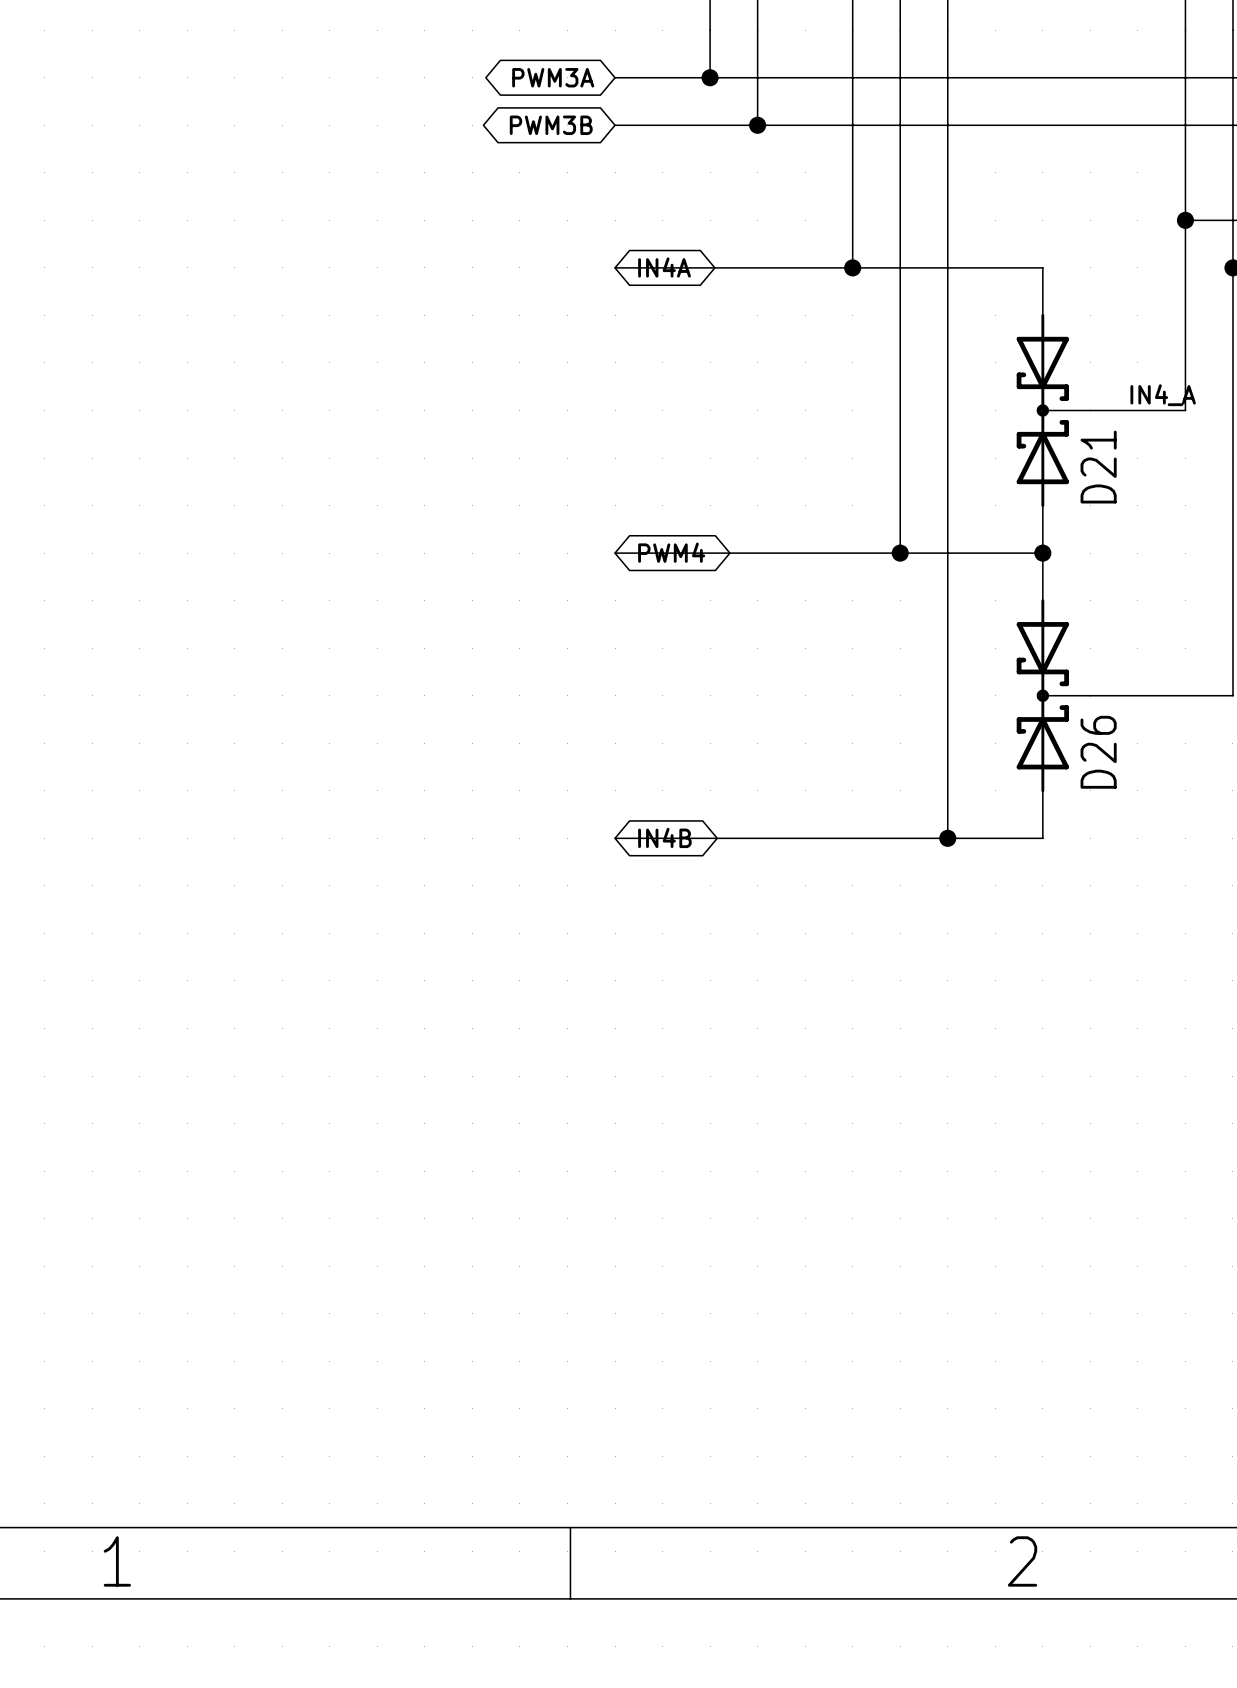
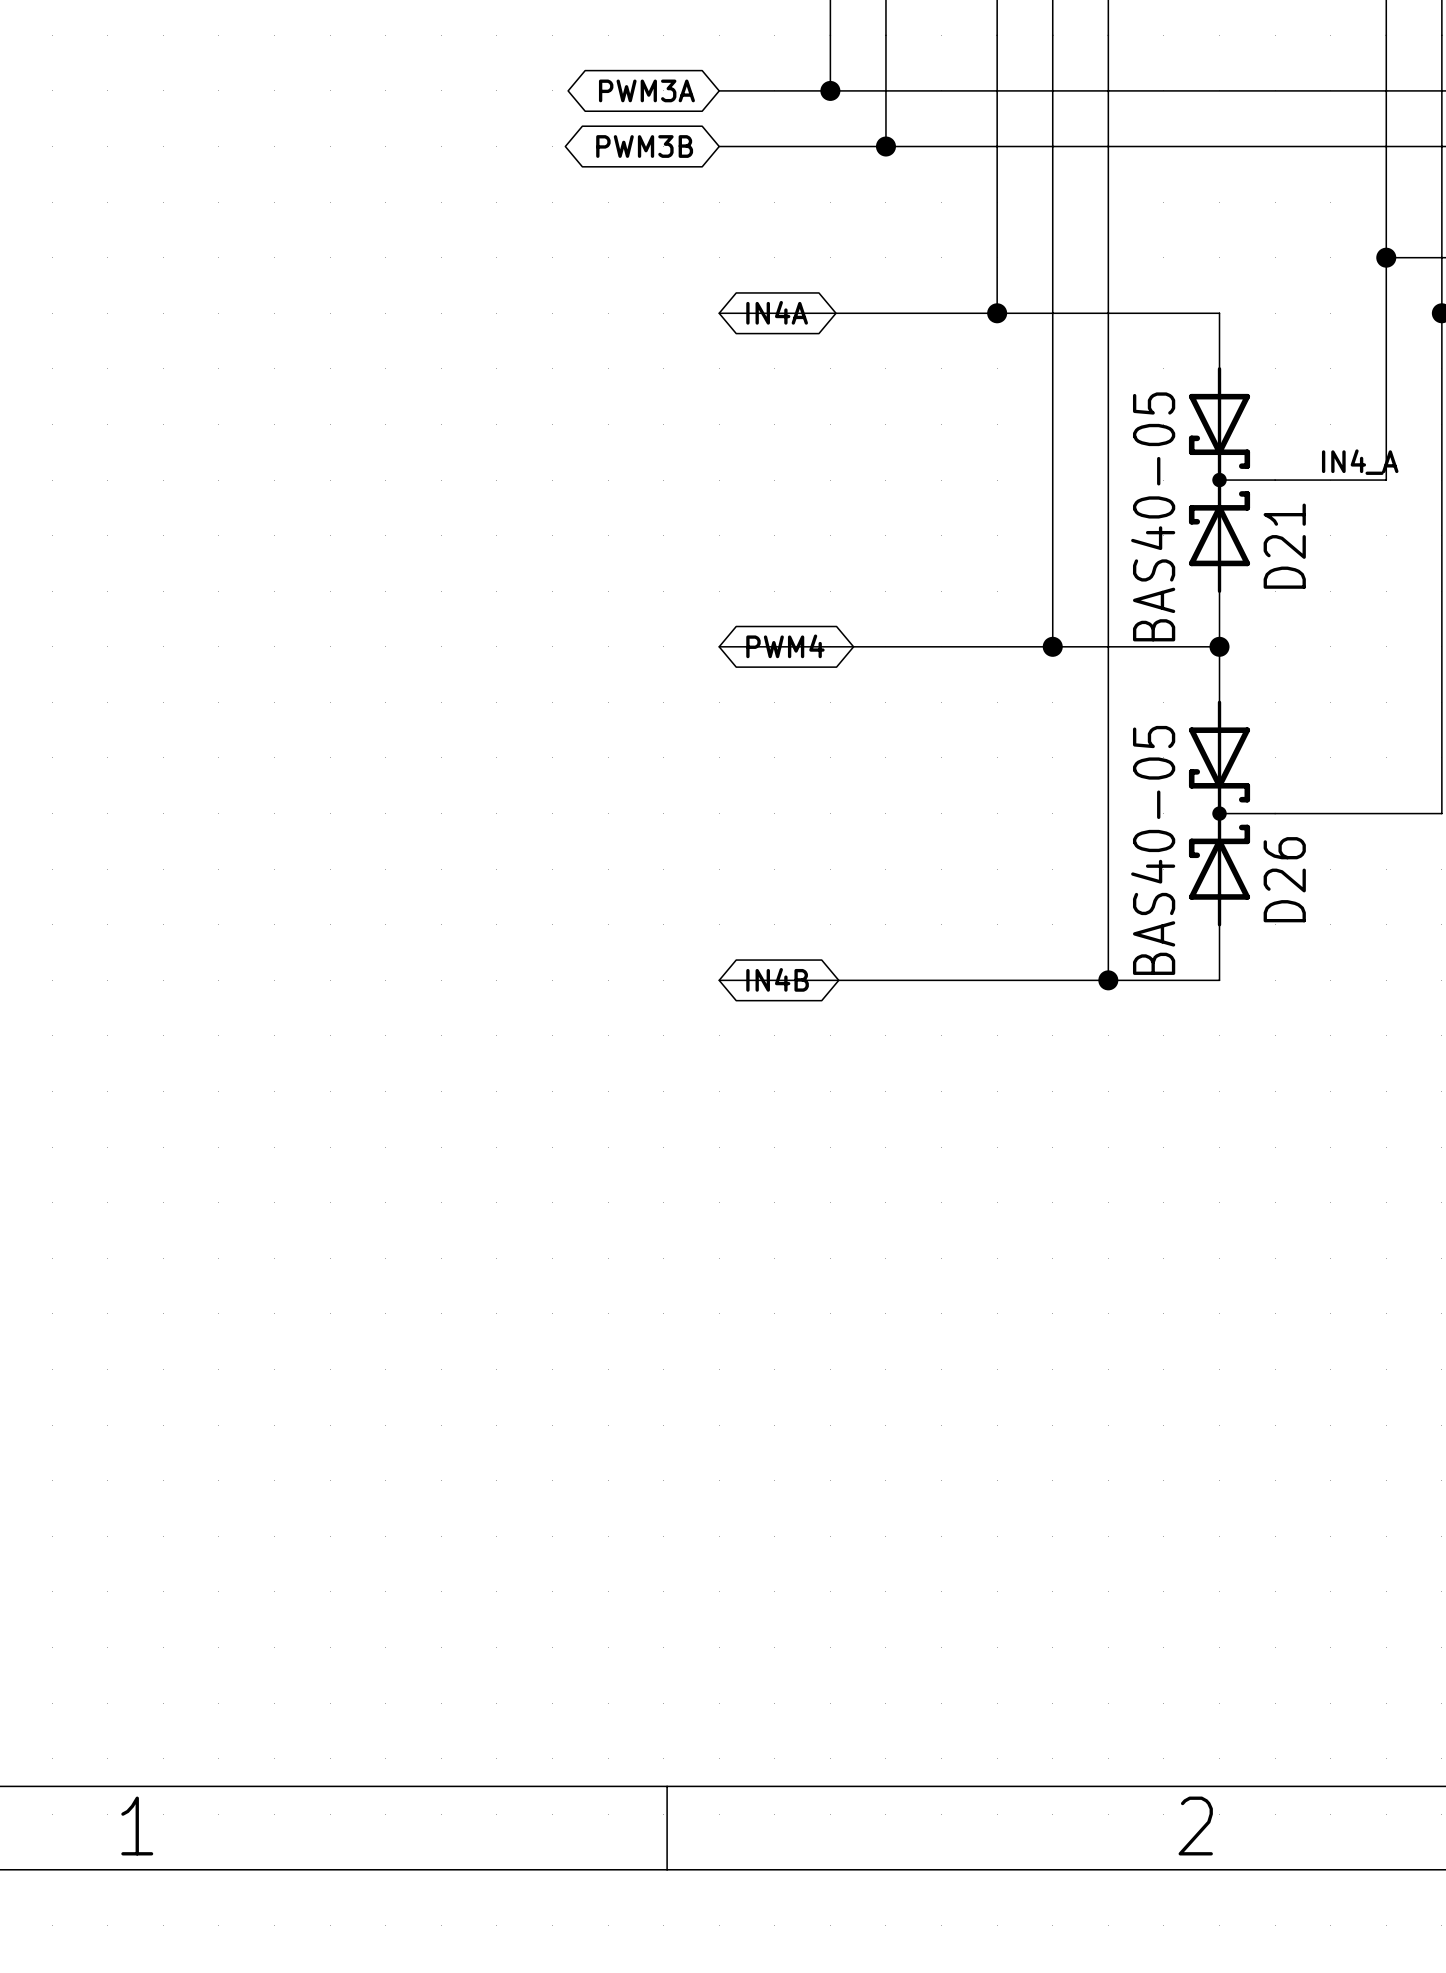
D21 value: none -> BAS40-05 (1153, 516)
D26 value: none -> BAS40-05 (1153, 850)

